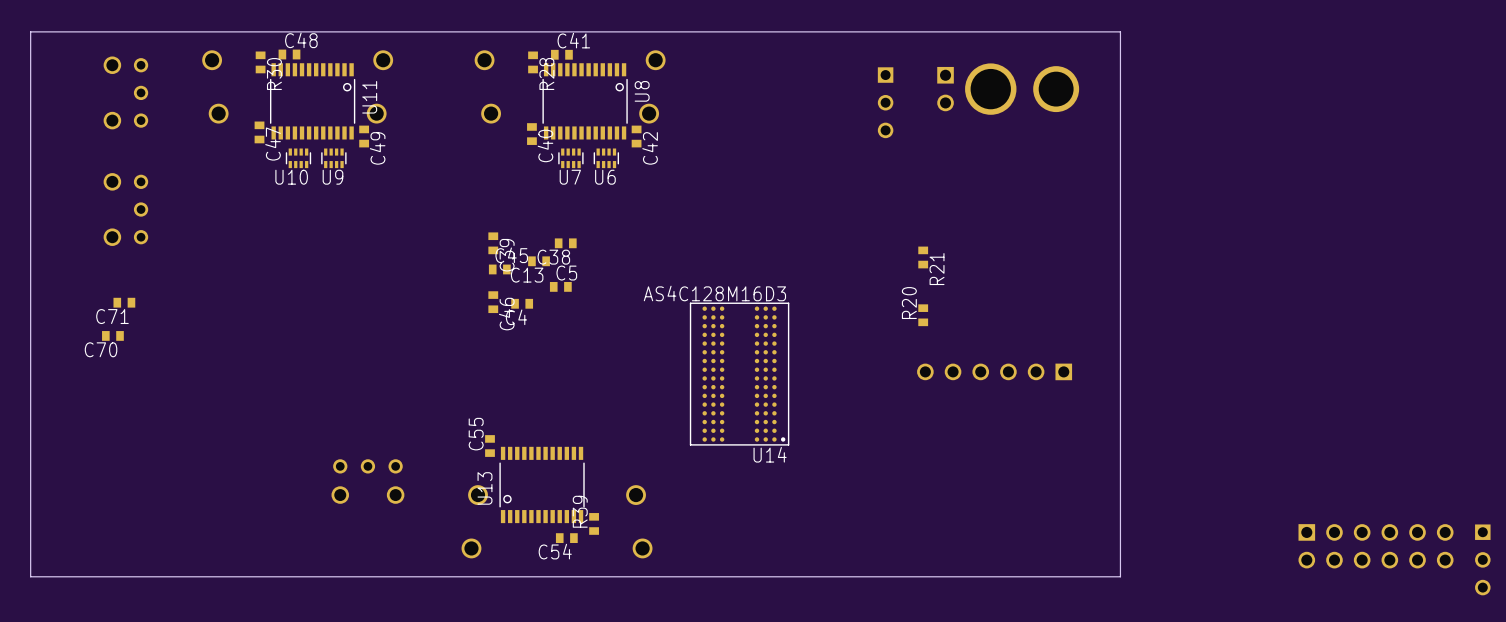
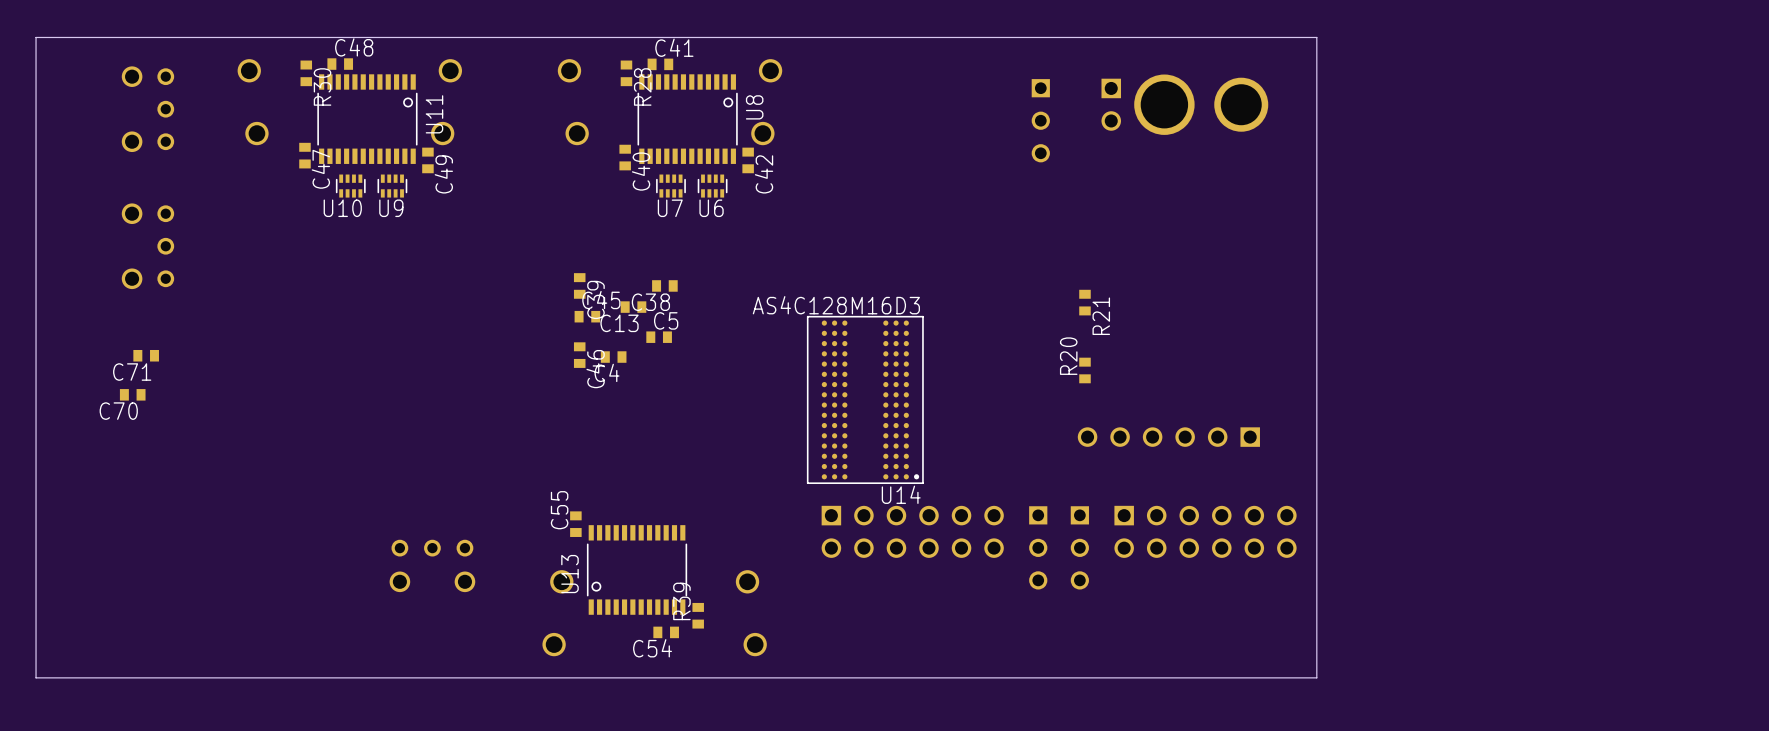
U14 position: (739, 374) -> (865, 399)
part: none -> (912, 531)
part: none -> (1205, 531)
part: none -> (1038, 547)
part: none -> (1079, 547)
part: (1376, 546) -> none
part: (1482, 559) -> none

